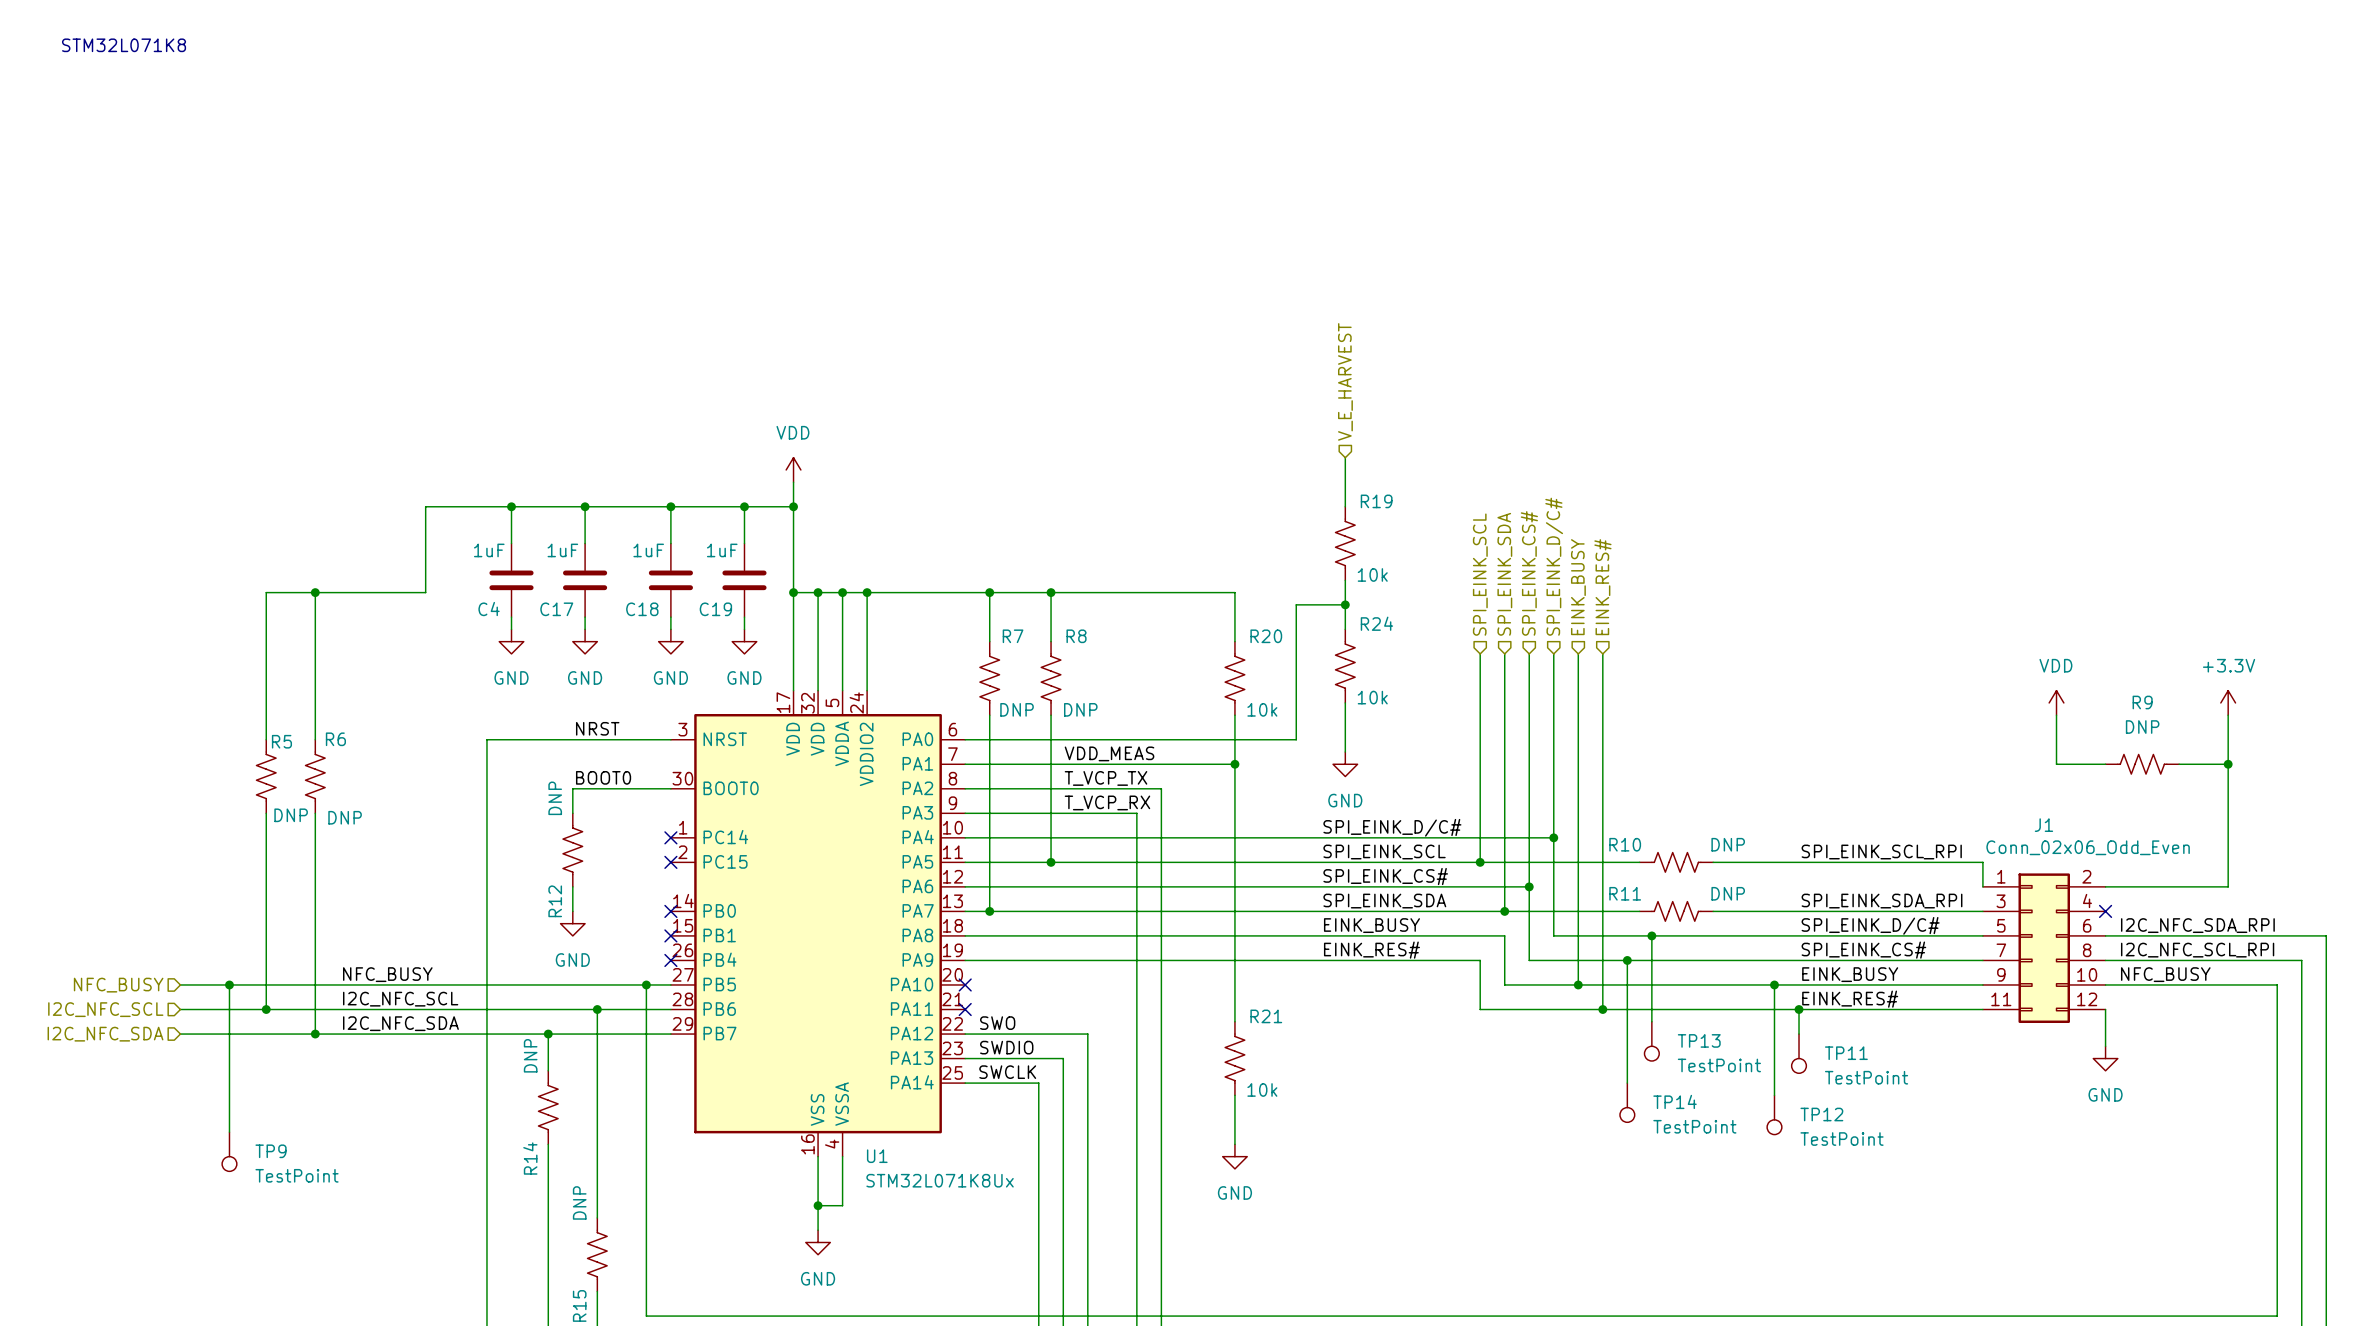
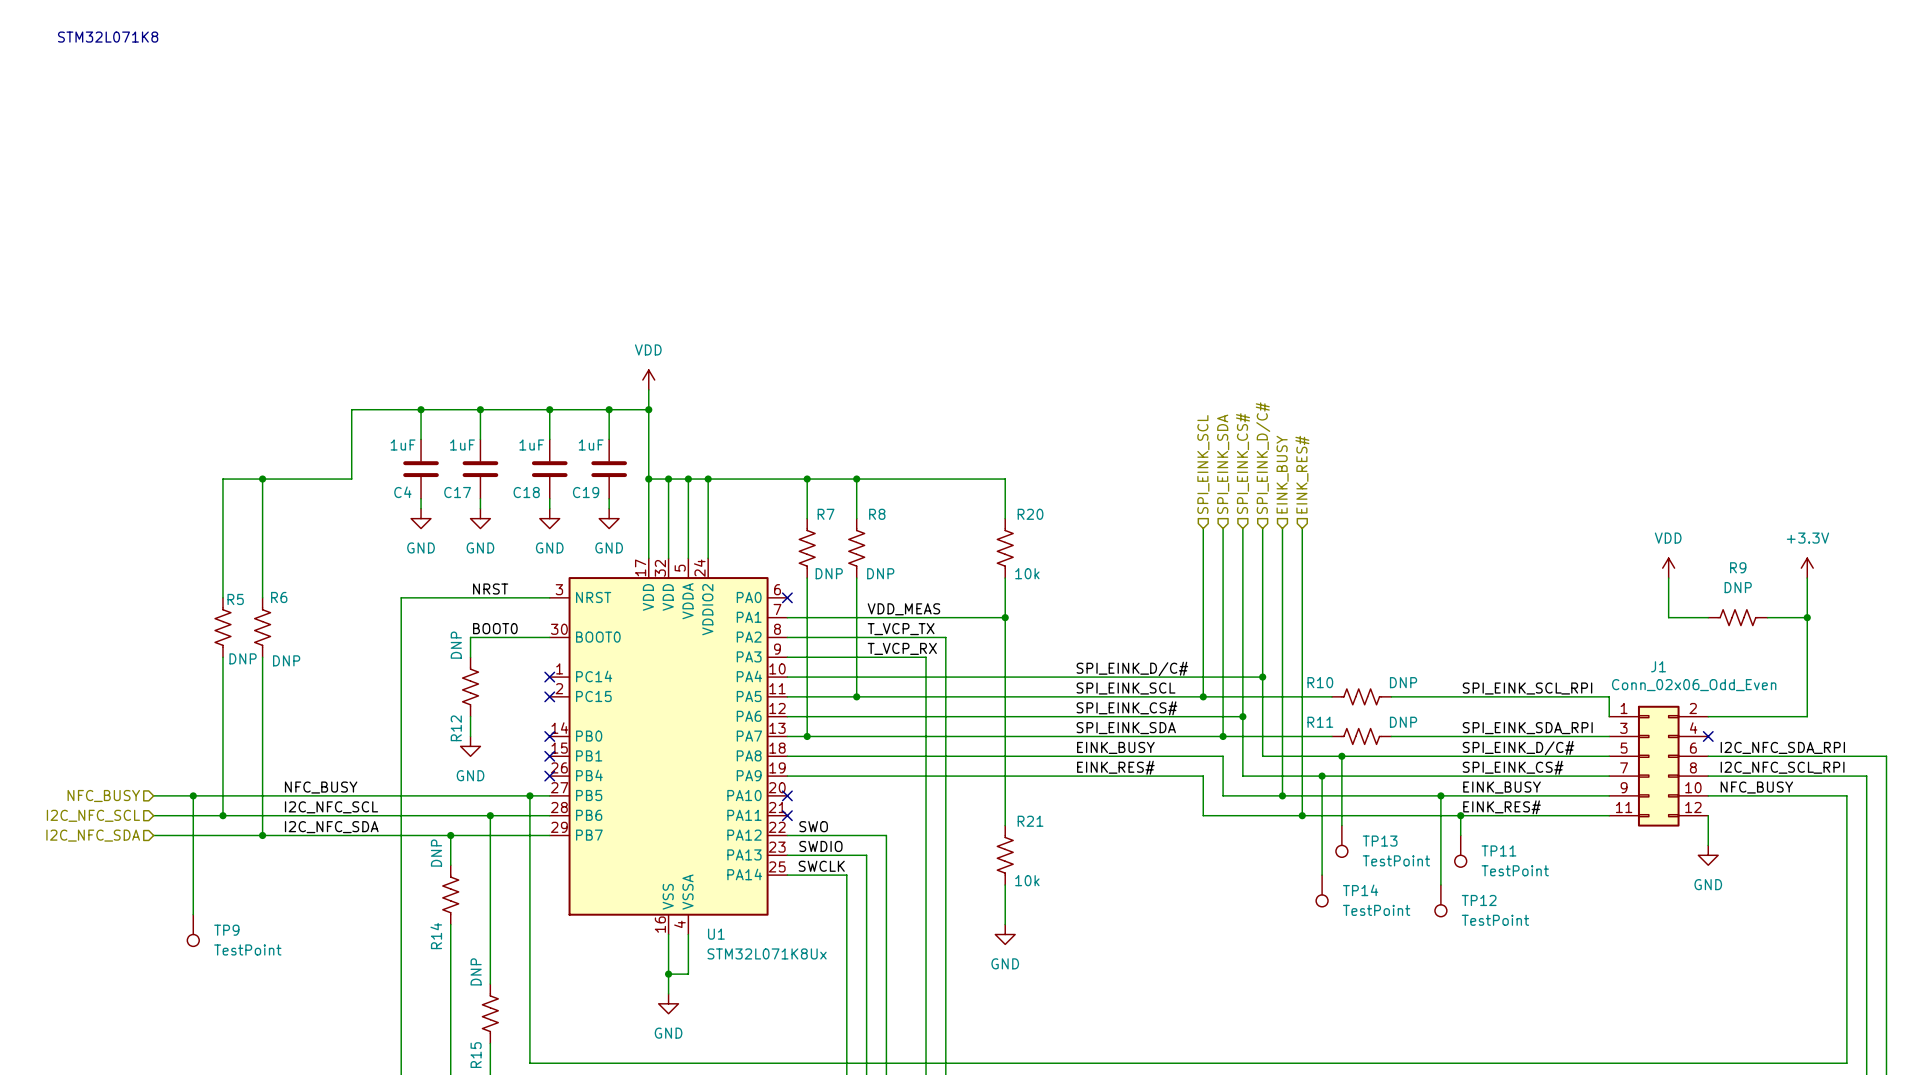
hierarchical label: V_E_HARVEST (1345, 381) -> none
wire: (1345, 457) (1345, 506) -> none
R19: 10k (1345, 543) -> none
wire: (1345, 580) (1345, 629) -> none
wire: (1345, 604) (1296, 604) (1296, 739) (965, 739) -> none
junction: (1345, 604) -> none
R24: 10k (1345, 666) -> none
wire: (1345, 702) (1345, 752) -> none
no-connect mark: none -> (787, 597)
power symbol: GND (1345, 764) -> none

